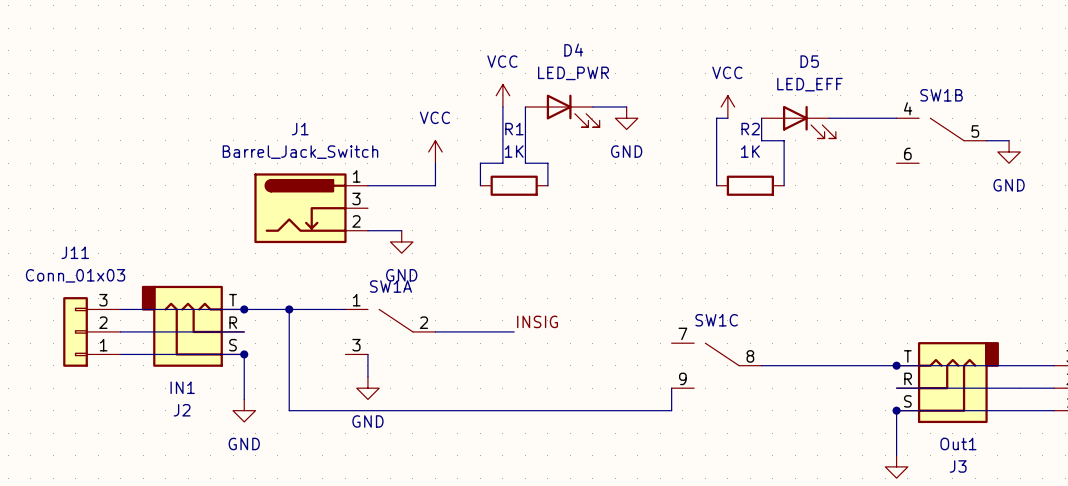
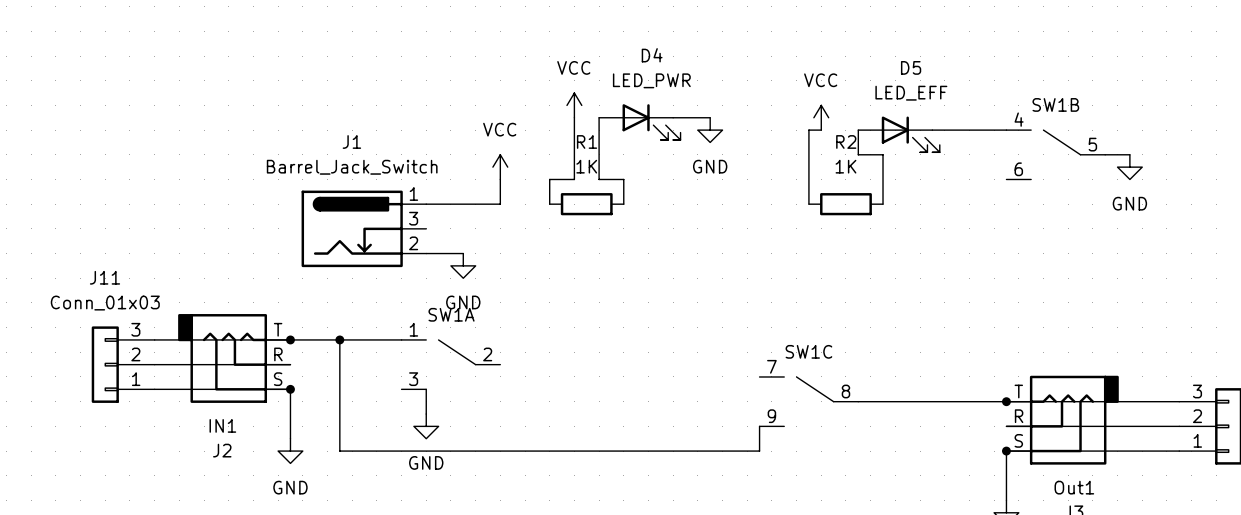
label: INSIG (537, 321) -> none
wire: (435, 331) (514, 331) -> none

